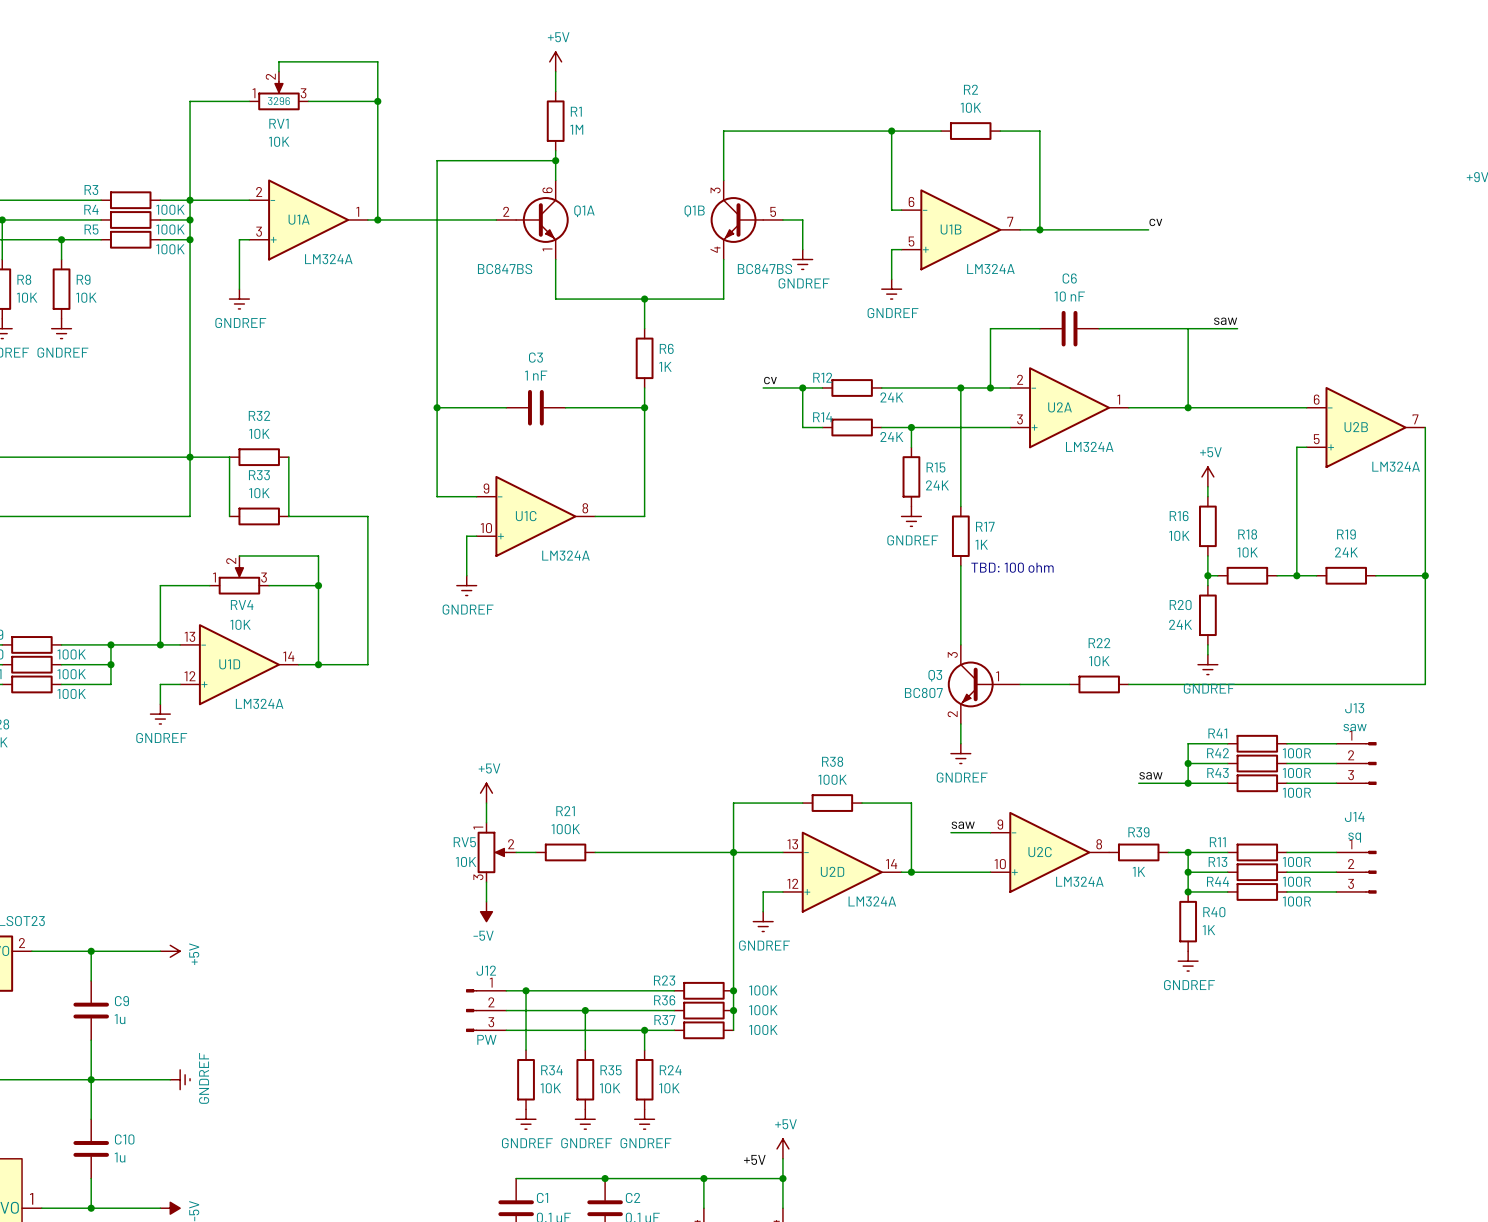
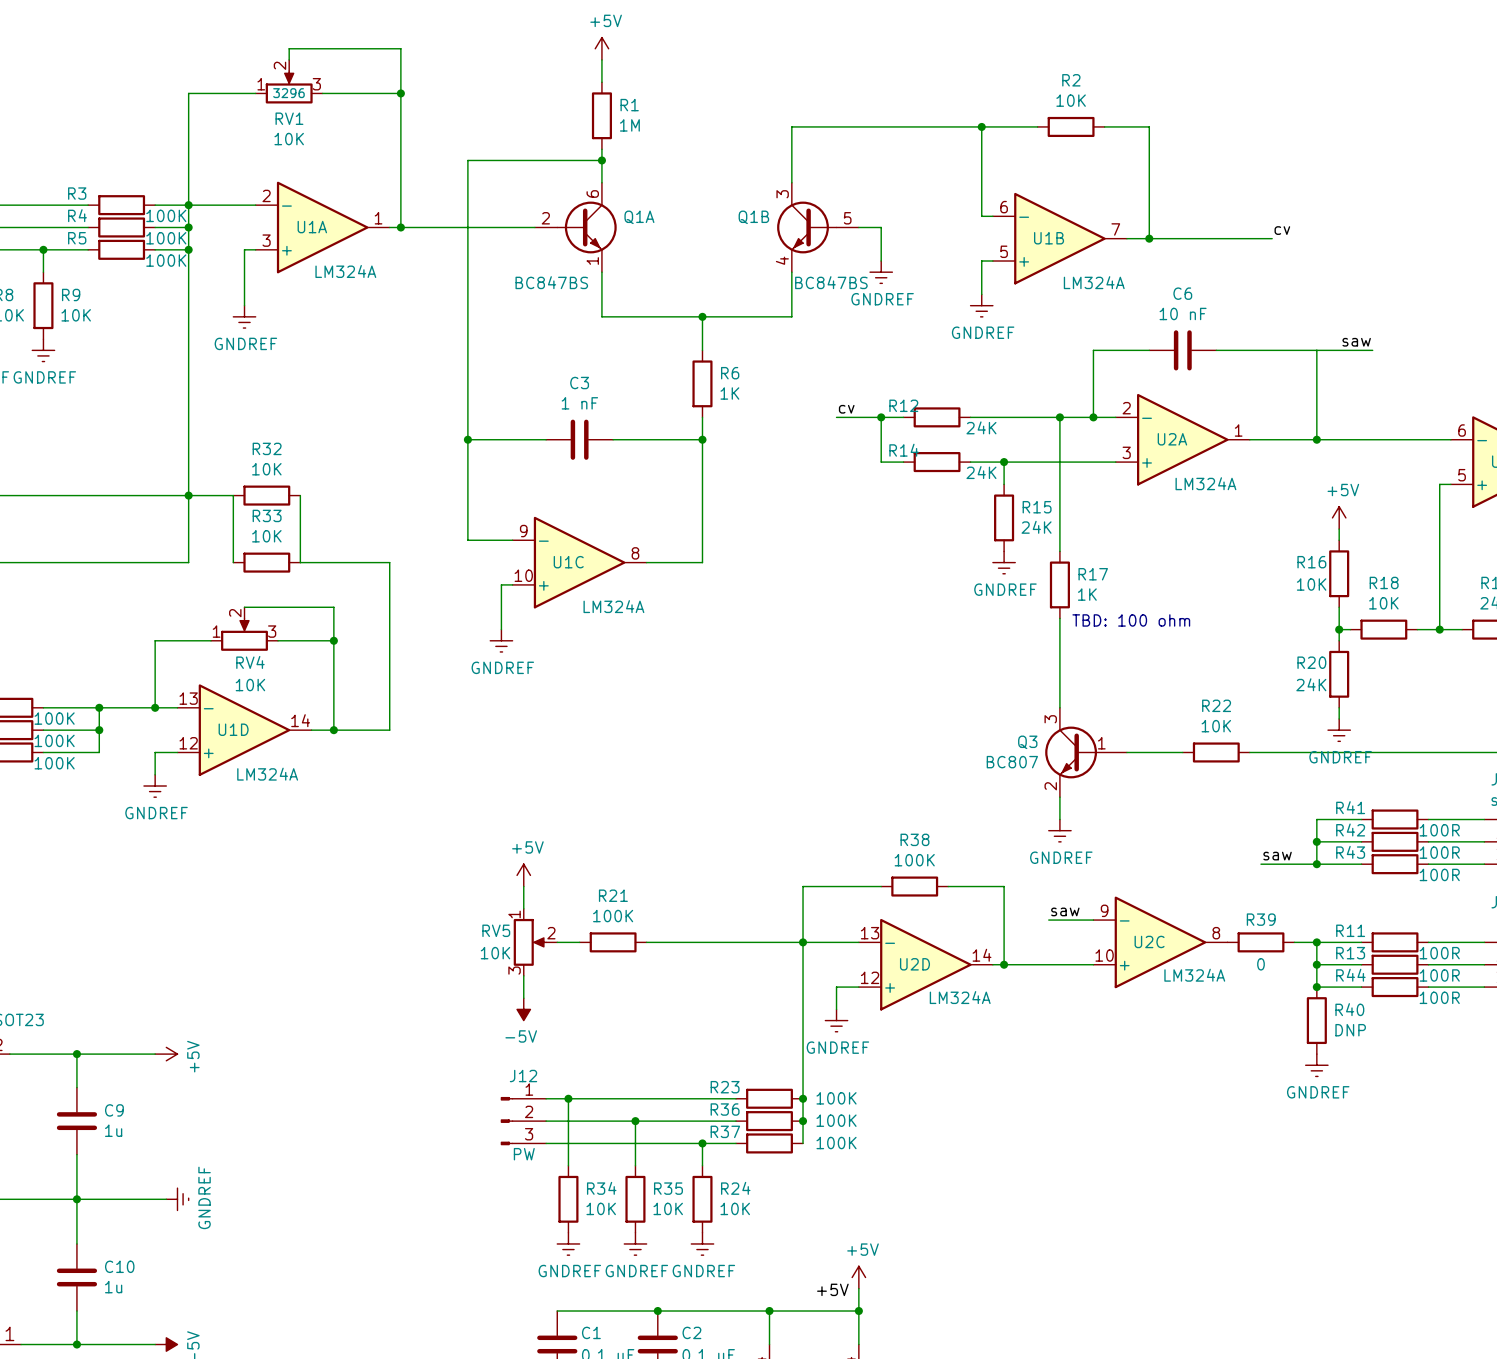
R39 value: 1K (1138, 871) -> 0 (1260, 964)
R40 value: 1K (1208, 930) -> DNP (1350, 1030)

